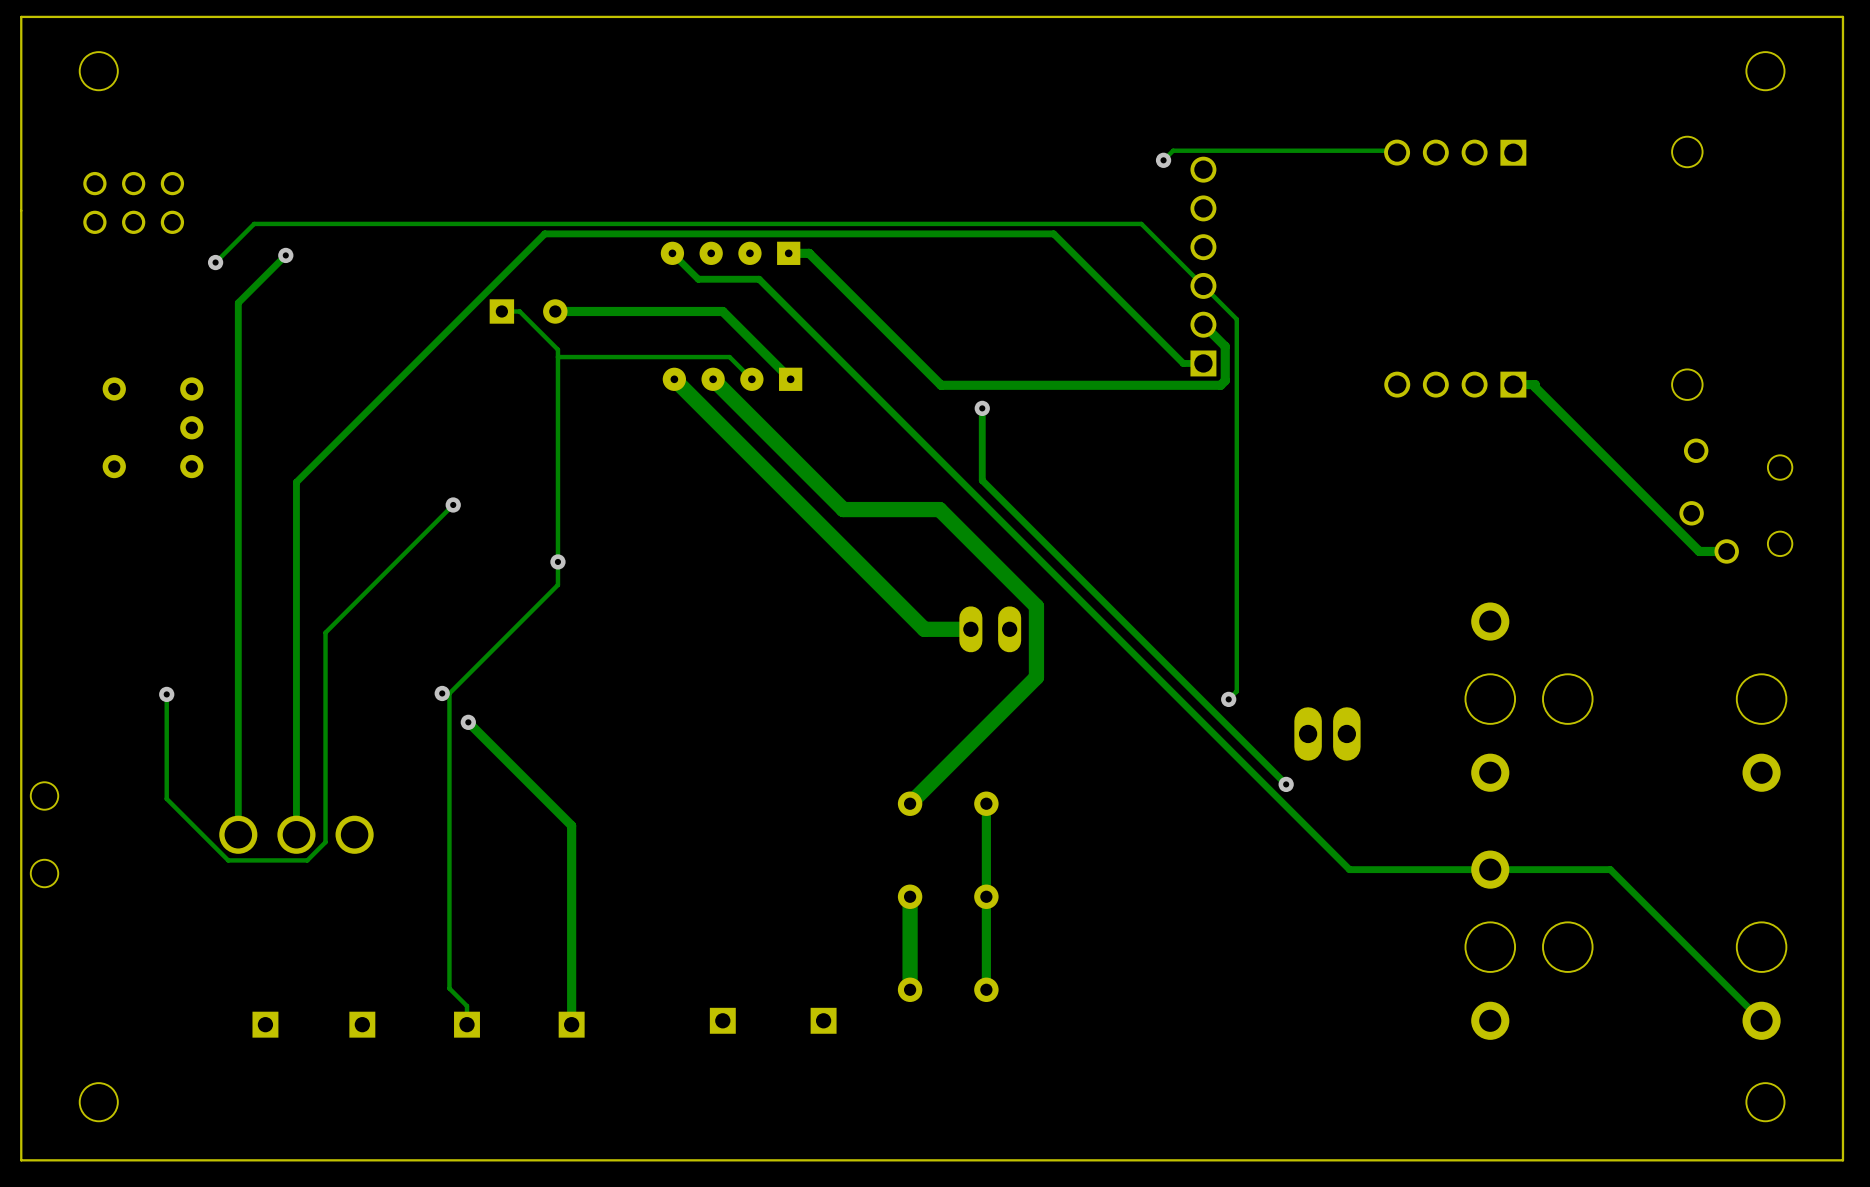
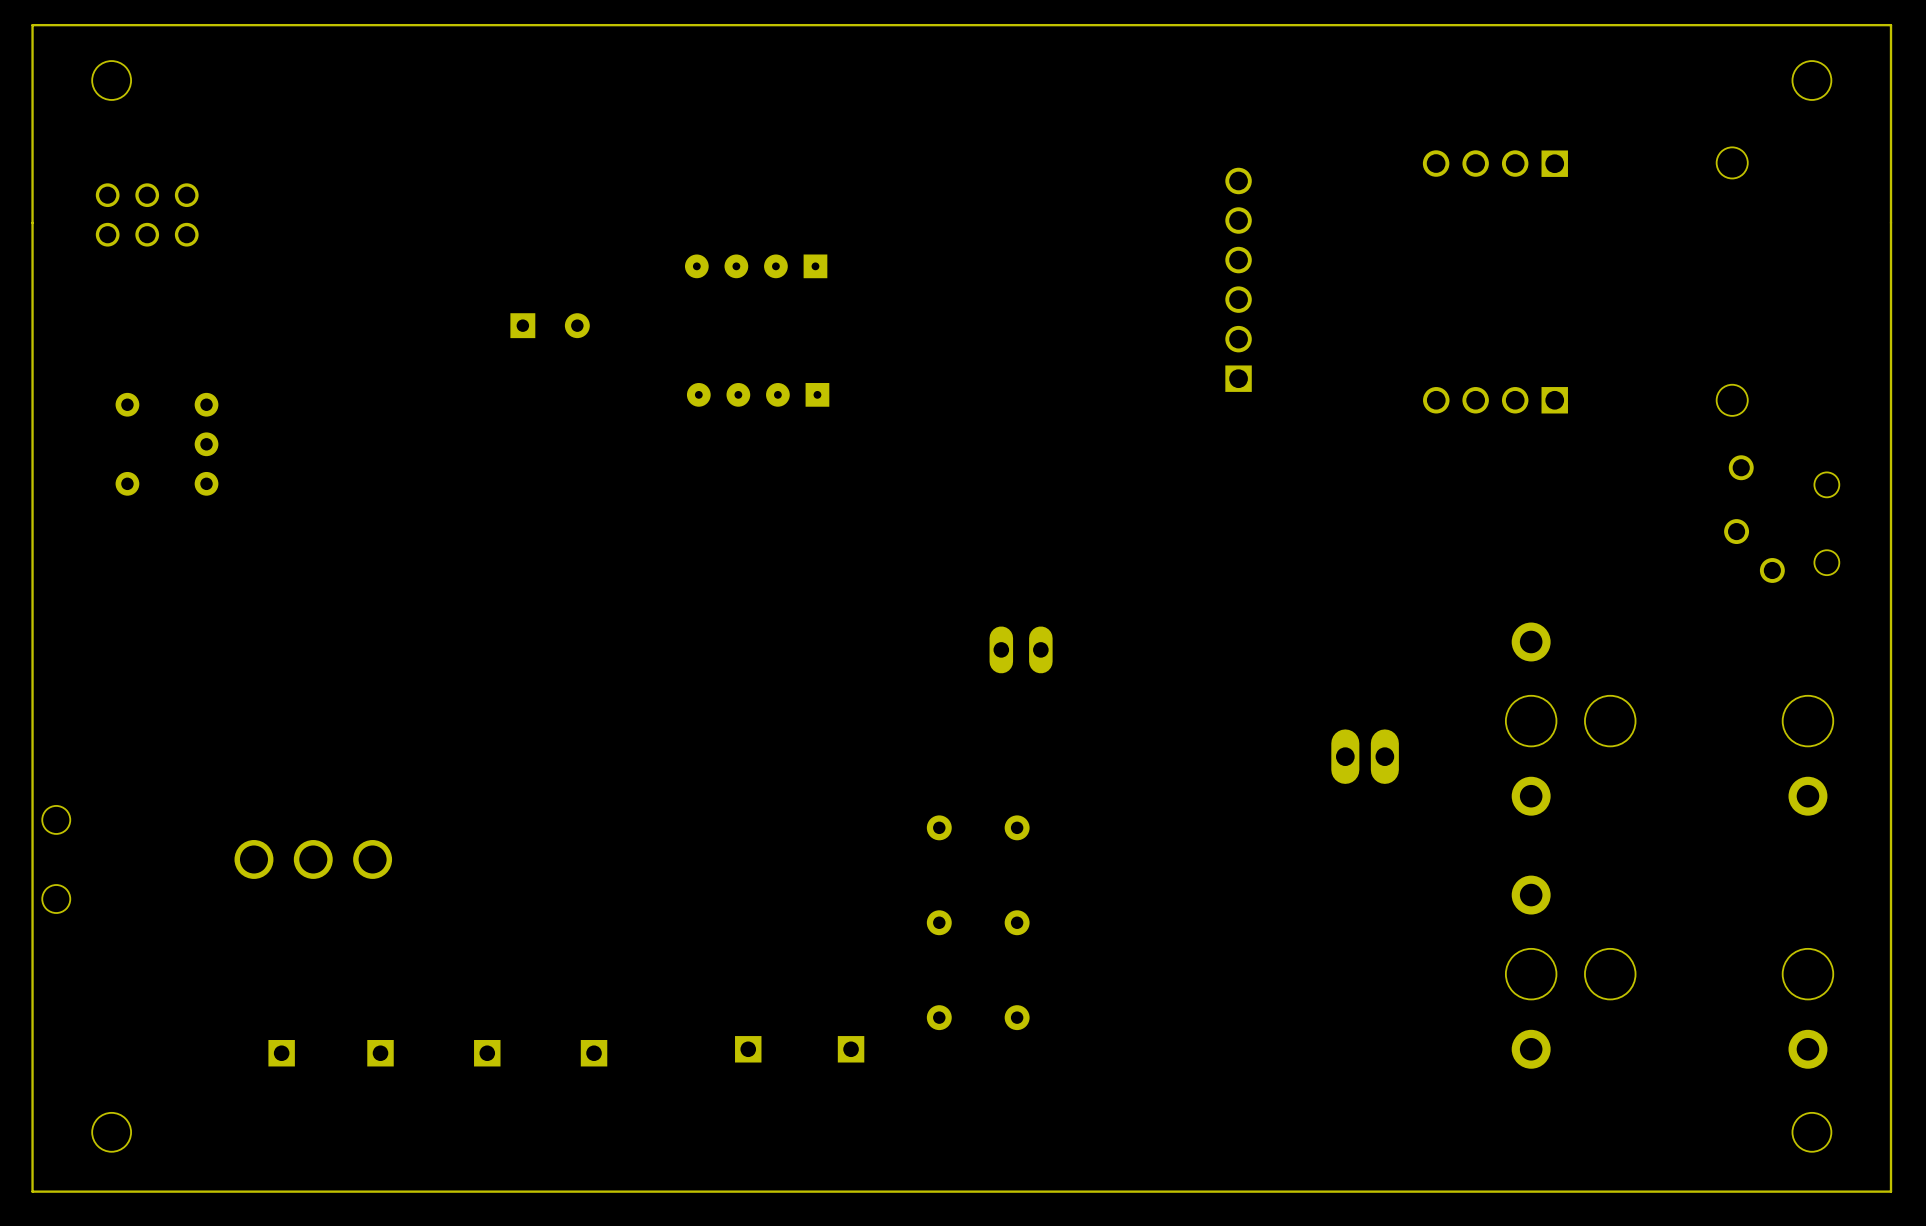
track: (1397, 152) (1395, 150) (1173, 150) (1163, 160) -> none
via: (1163, 160) -> none
track: (672, 253) (698, 279) (759, 279) (1349, 869) (1610, 869) (1761, 1020) -> none
track: (788, 253) (809, 253) (941, 385) (1220, 385) (1225, 380) (1225, 346) (1203, 324) -> none
track: (285, 255) (238, 302) (238, 834) -> none
via: (285, 255) -> none
track: (215, 262) (254, 223) (1141, 223) (1236, 319) (1236, 691) (1228, 699) -> none
via: (215, 262) -> none
track: (501, 311) (519, 311) (557, 349) (557, 584) (449, 693) -> none
track: (555, 311) (722, 311) (790, 379) -> none
track: (557, 357) (729, 357) (751, 379) -> none
track: (1203, 363) (1183, 363) (1053, 233) (544, 233) (296, 482) (296, 834) -> none
track: (674, 379) (924, 629) (970, 629) -> none
track: (713, 379) (843, 509) (939, 509) (1036, 606) (1036, 677) (910, 803) -> none
track: (1513, 384) (1535, 384) (1535, 387) (1699, 551) (1726, 551) -> none
track: (982, 408) (982, 480) (1286, 784) -> none
via: (982, 408) -> none
track: (453, 504) (325, 632) (325, 842) (307, 860) (228, 860) (166, 798) (166, 694) -> none
via: (453, 504) -> none
via: (557, 561) -> none
via: (442, 693) -> none
track: (449, 693) (449, 988) (467, 1006) (467, 1024) -> none
via: (166, 694) -> none
via: (1228, 699) -> none
track: (468, 722) (571, 825) (571, 1024) -> none
via: (468, 722) -> none
via: (1286, 784) -> none
track: (986, 803) (986, 989) -> none
track: (910, 896) (910, 989) -> none

